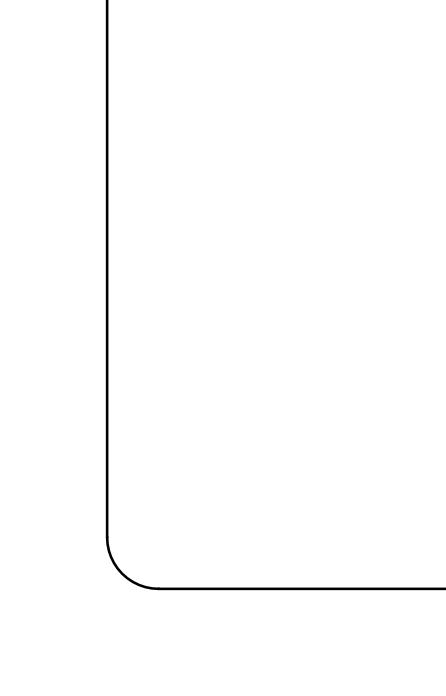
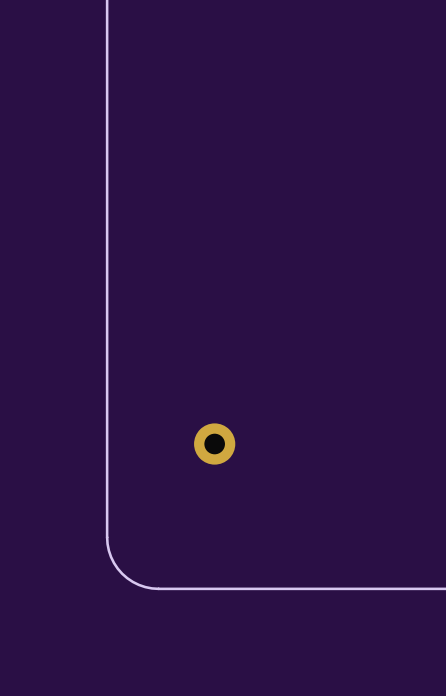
via: none -> (214, 444)

